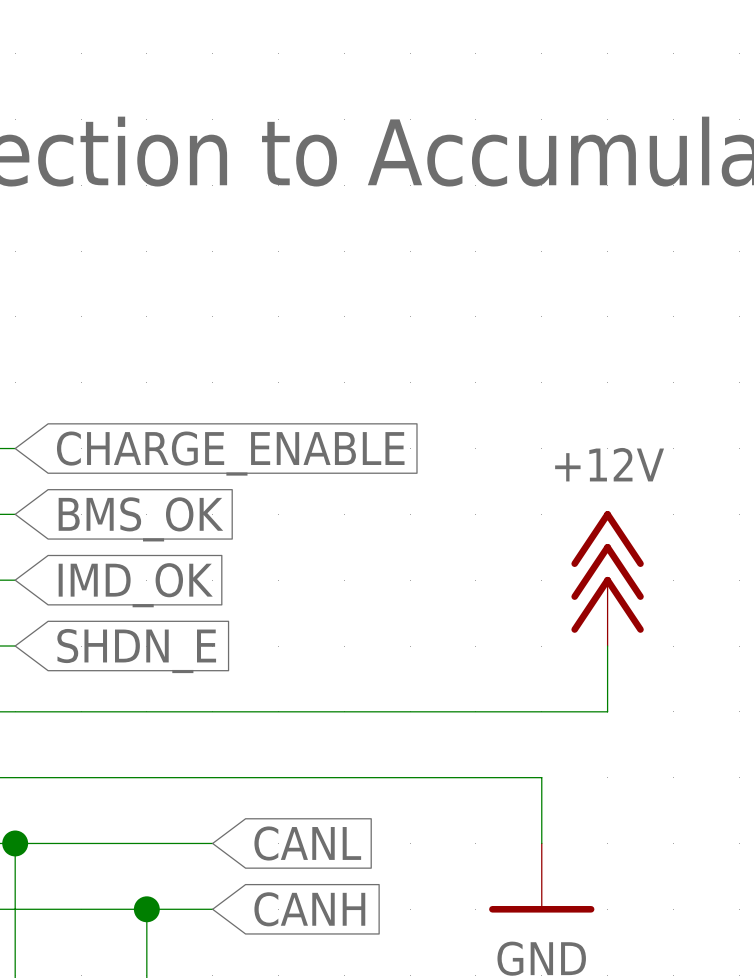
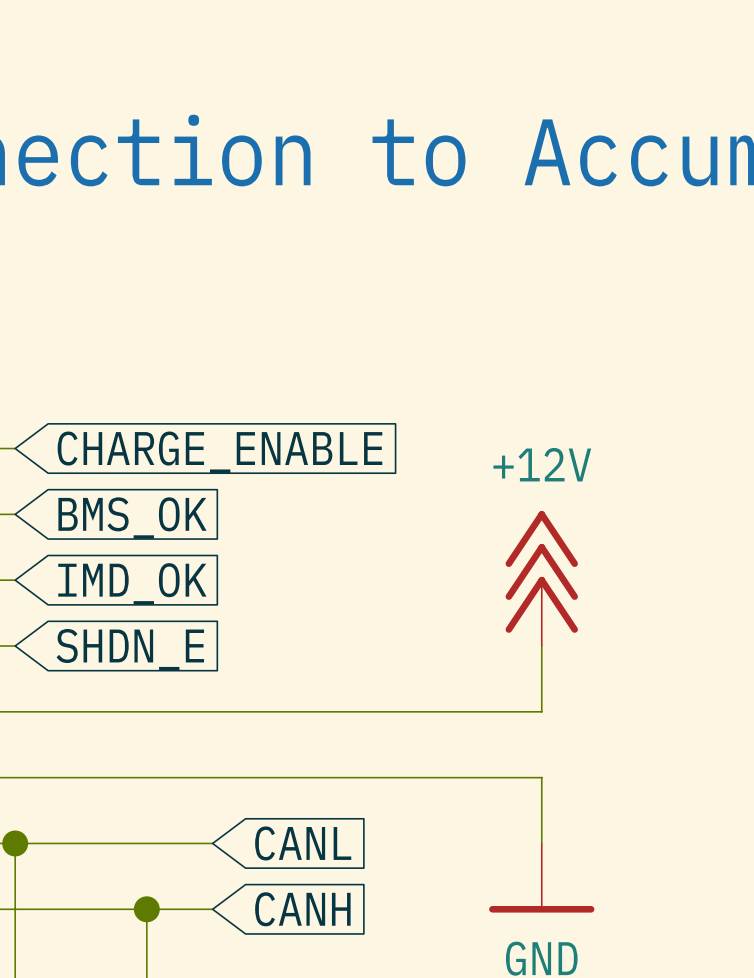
power symbol position: +12V (607, 578) -> +12V (541, 578)
wire: (607, 646) (607, 711) (541, 711) -> (541, 646) (541, 711)

